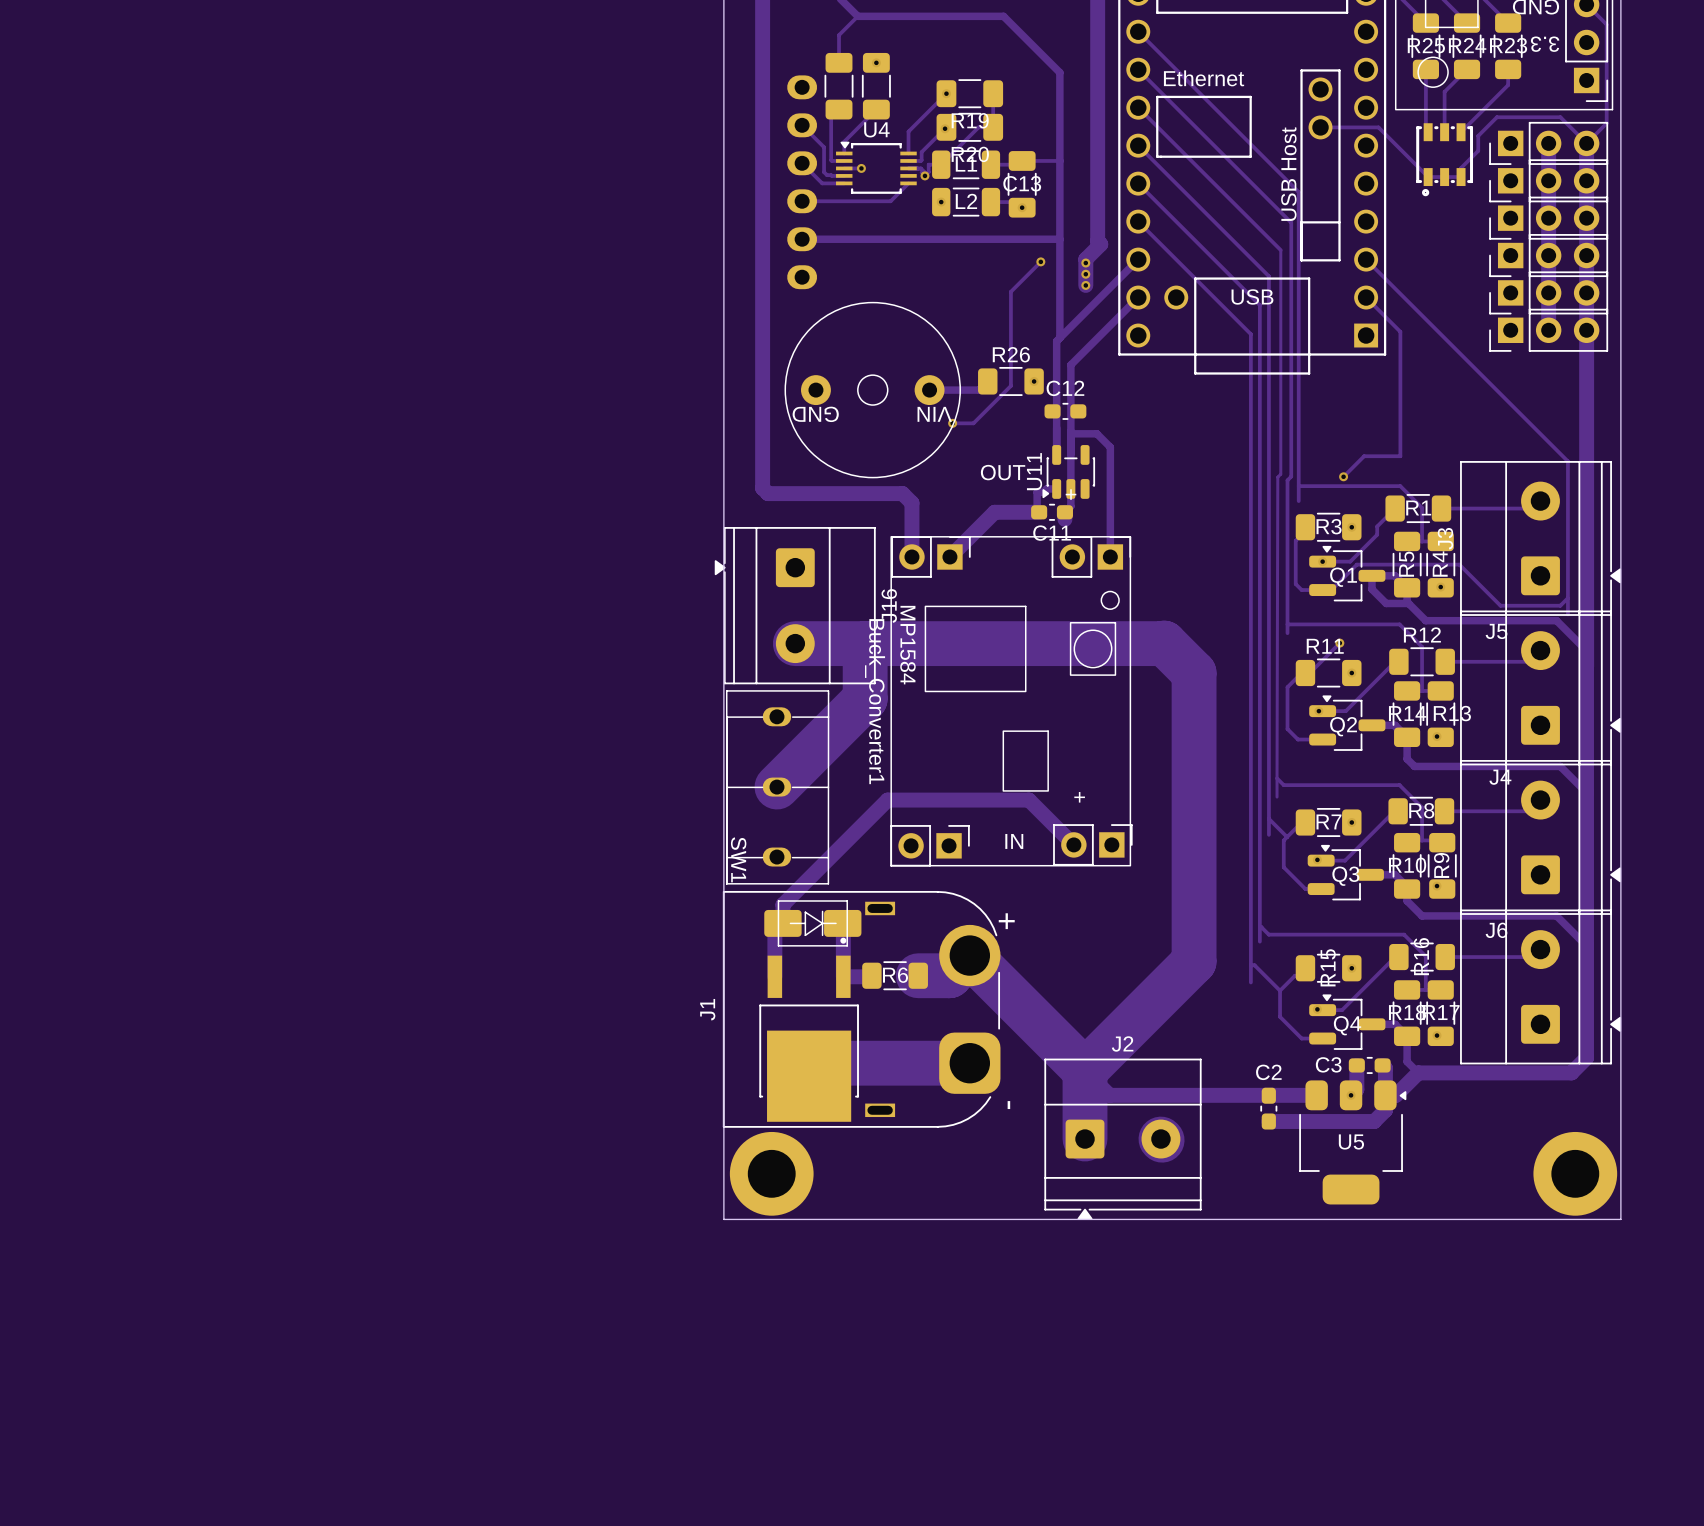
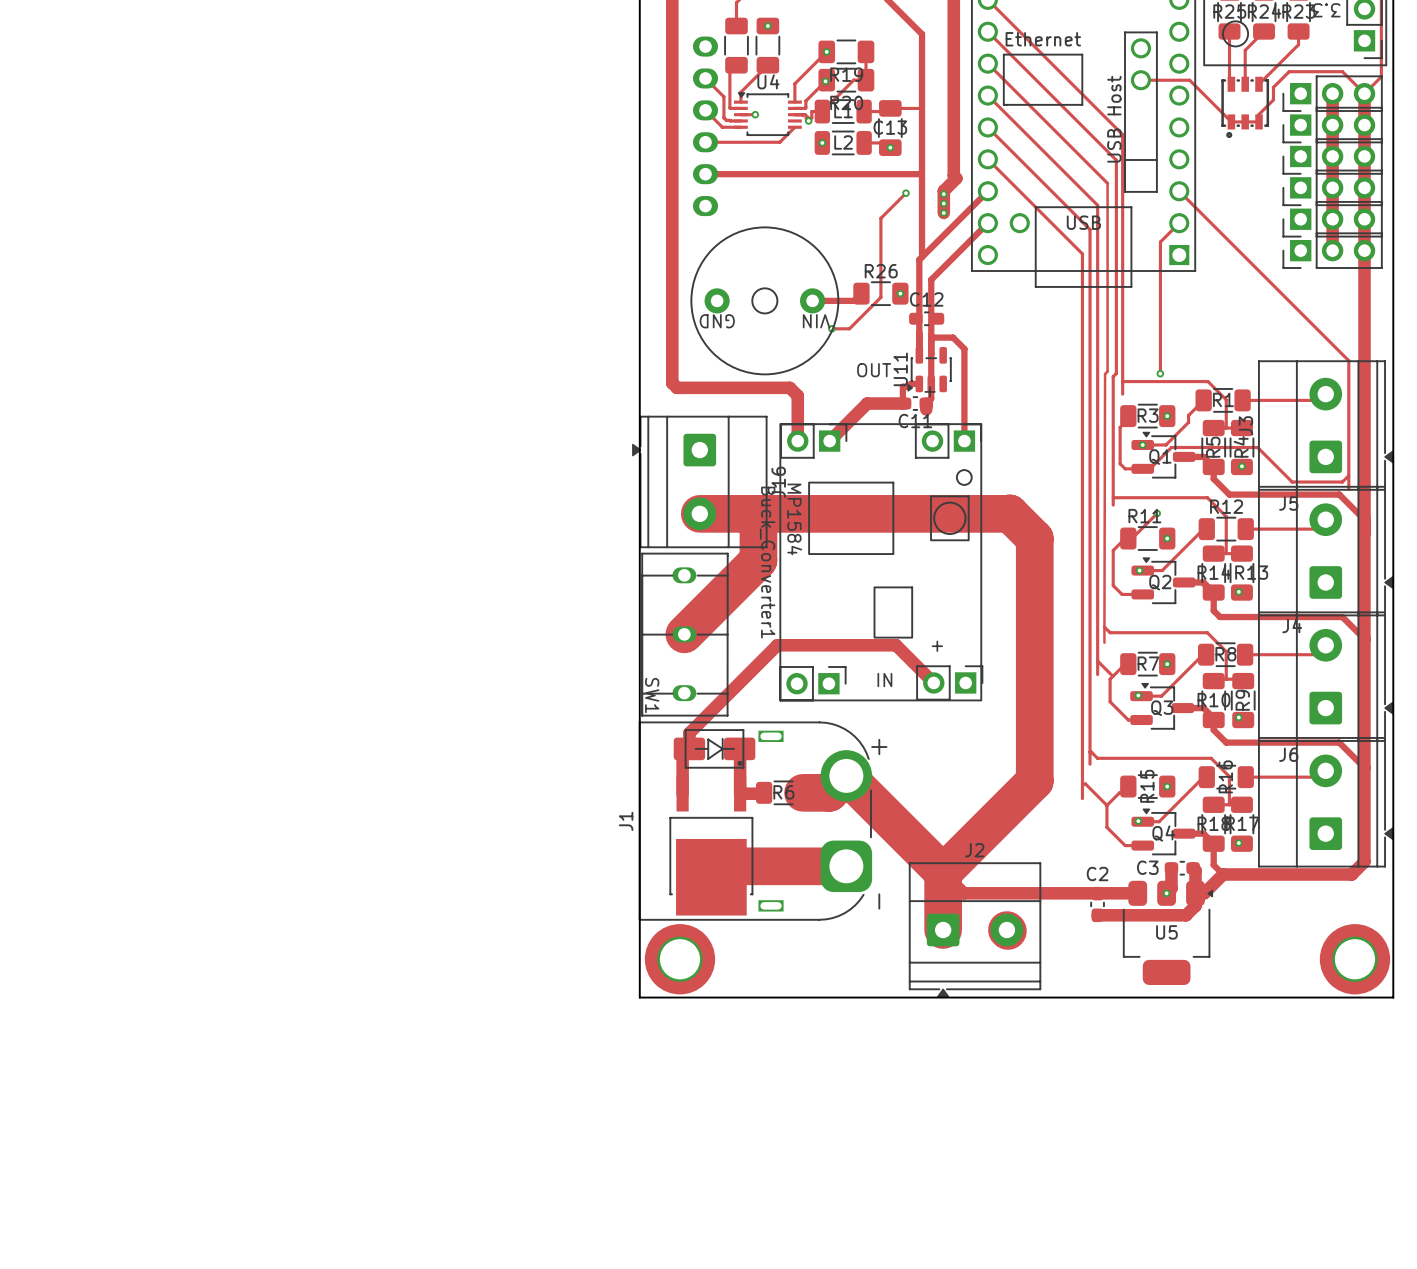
track: (1366, 297) (1400, 331) (1400, 456) (1364, 456) (1343, 476) -> (1179, 223) (1160, 241) (1160, 373)
track: (1371, 575) (1371, 589) (1386, 603) (1408, 603) -> none

